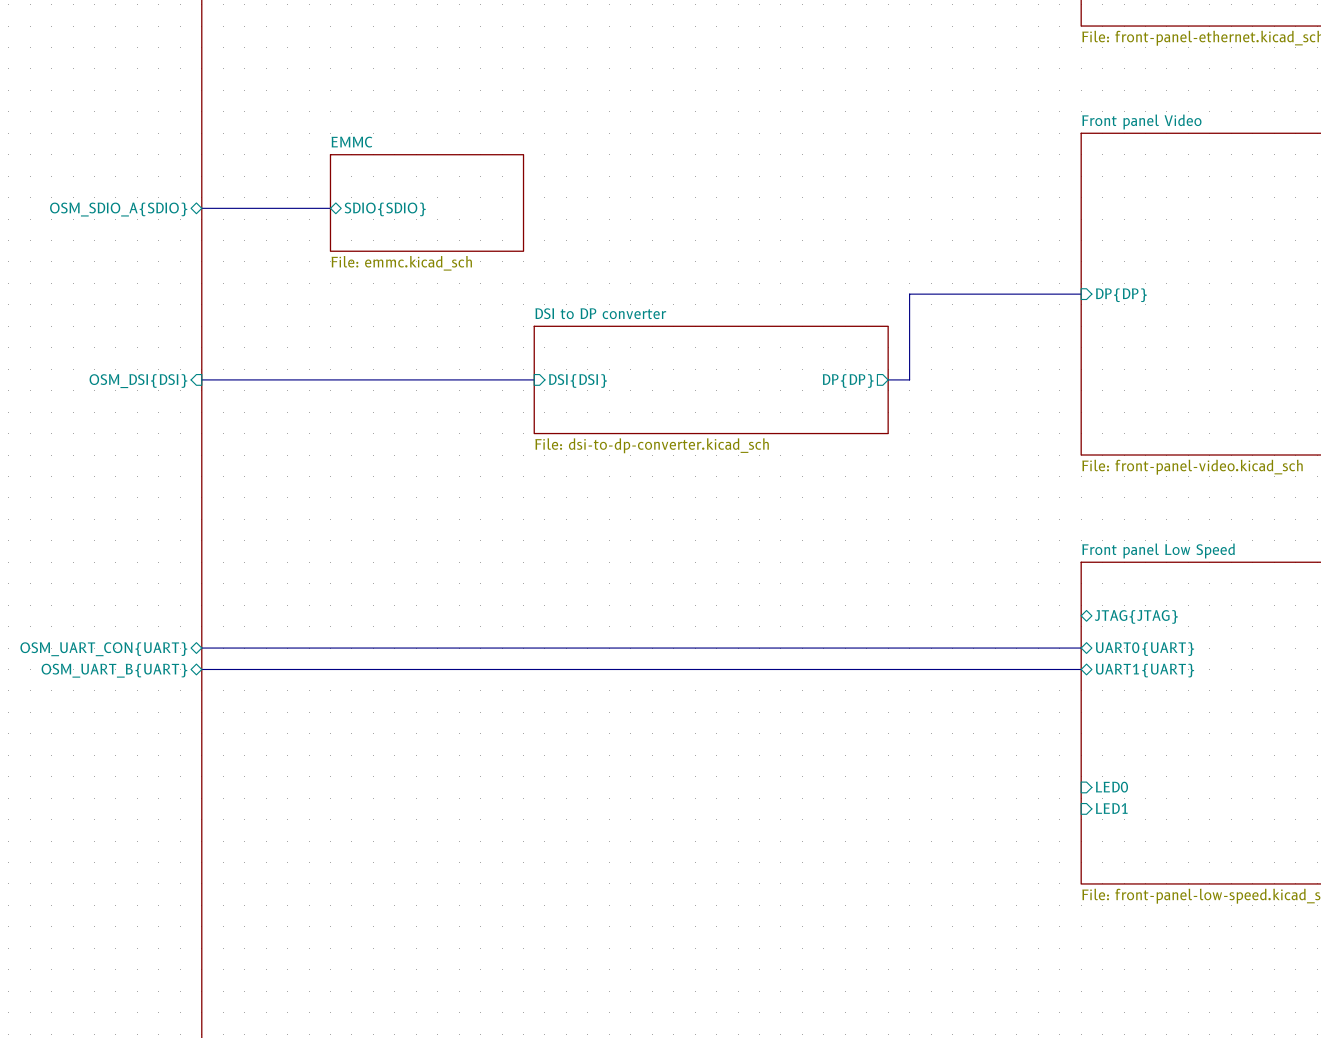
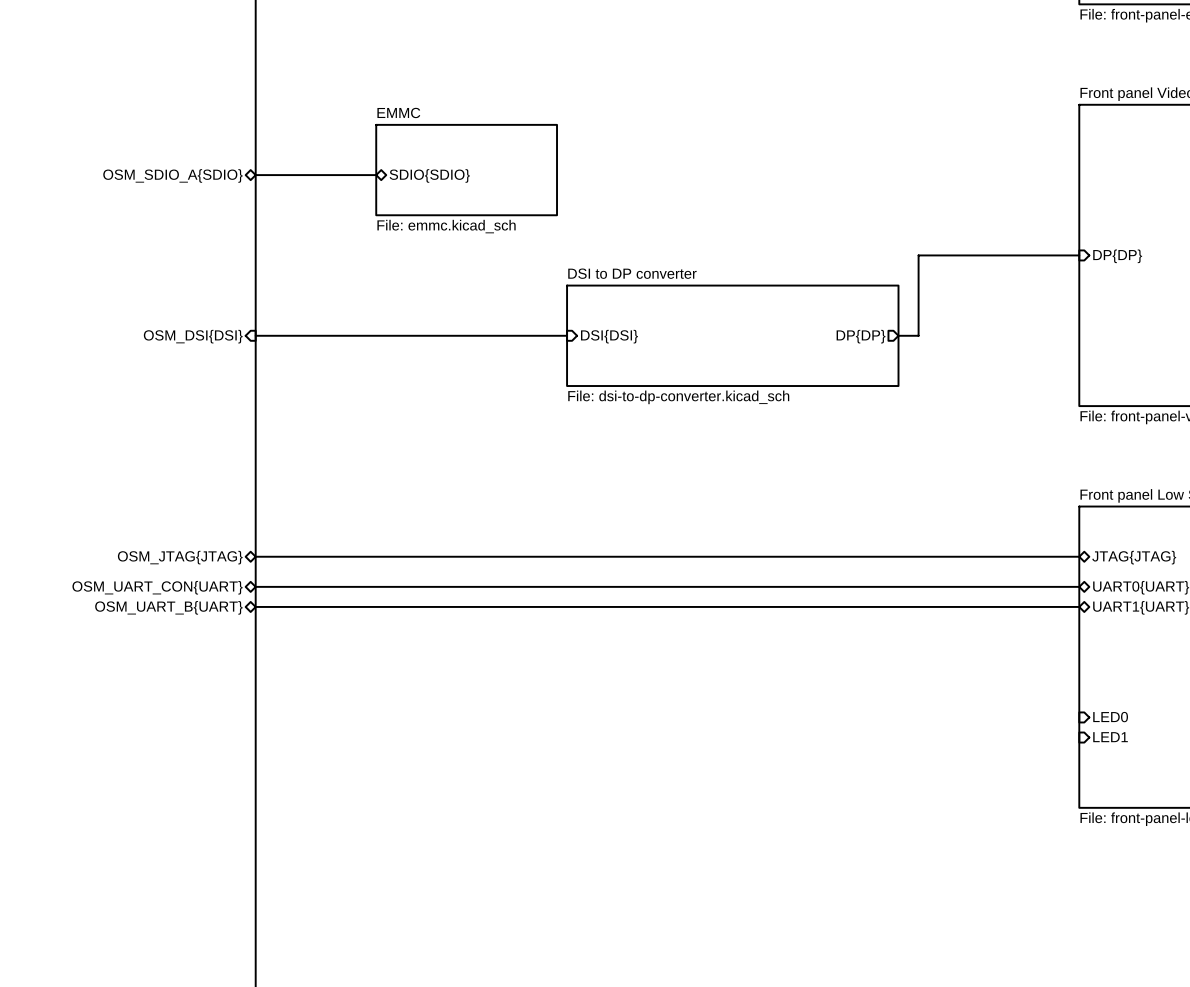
bus: none -> (255, 556) (1079, 556)
sheet pin: none -> OSM_JTAG{JTAG} (180, 557)

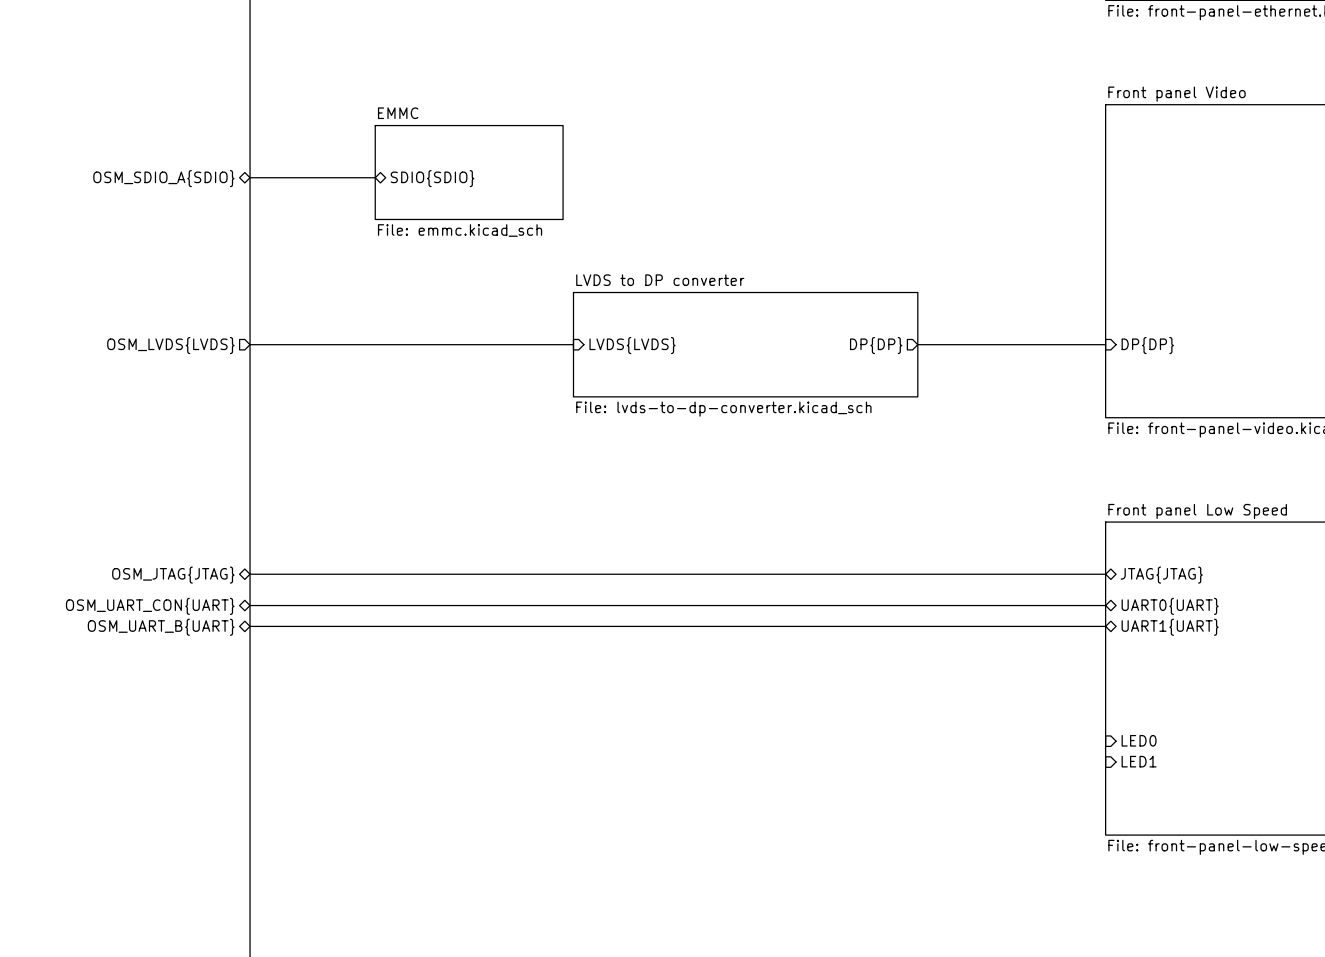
bus: (1079, 255) (918, 255) (918, 335) -> (1105, 344) (938, 344)
sheet pin position: DP{DP} (1117, 256) -> DP{DP} (1147, 345)
sheet DSI to DP converter name: DSI to DP converter (632, 273) -> LVDS to DP converter (660, 280)
sheet pin shape: input (193, 336) -> output (170, 345)
sheet pin: OSM_DSI{DSI} (193, 336) -> OSM_LVDS{LVDS} (170, 345)
sheet pin: DSI{DSI} (609, 336) -> LVDS{LVDS} (632, 345)
sheet DSI to DP converter value: File: dsi-to-dp-converter.kicad_sch (678, 397) -> File: lvds-to-dp-converter.kicad_sch (723, 409)

